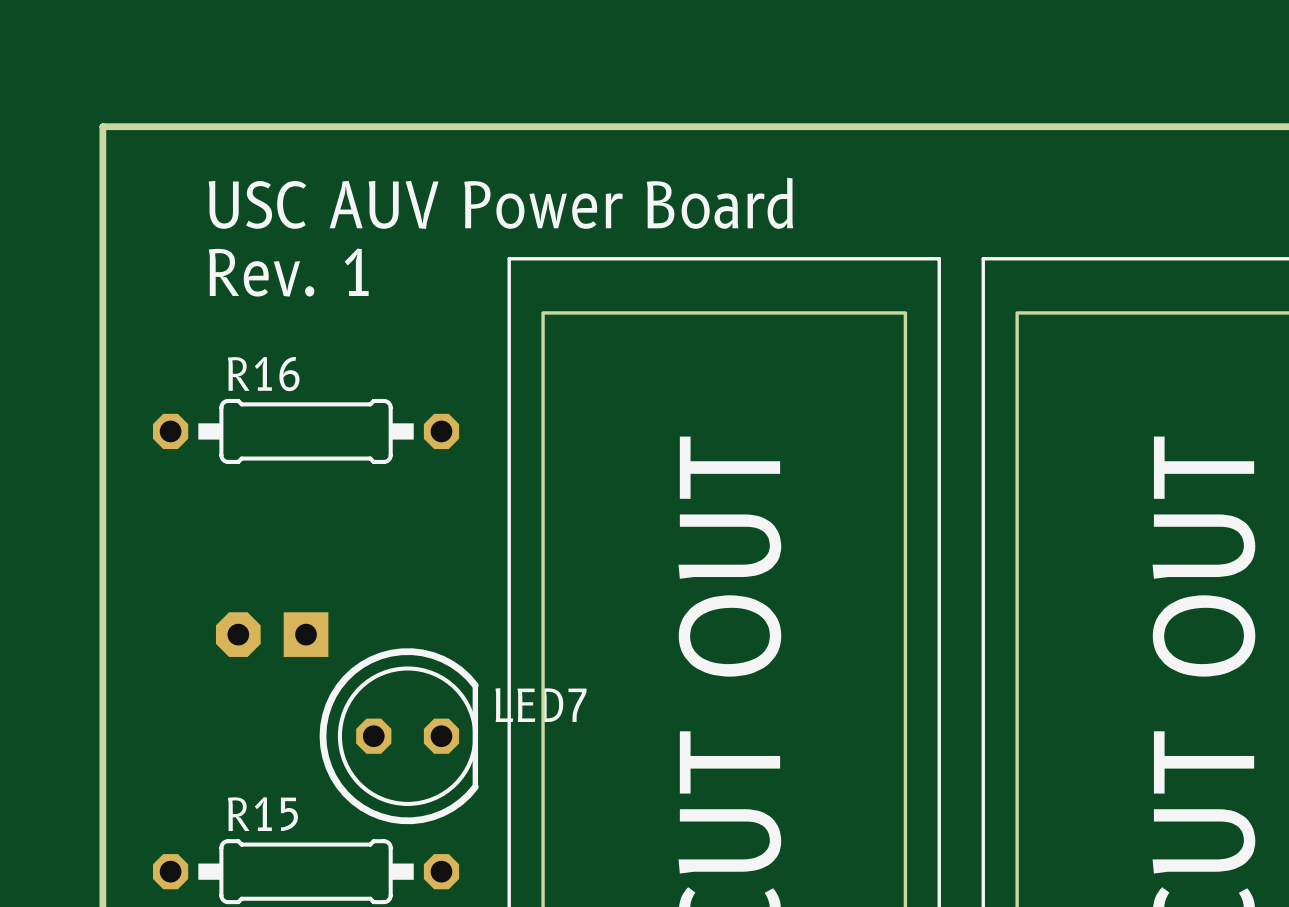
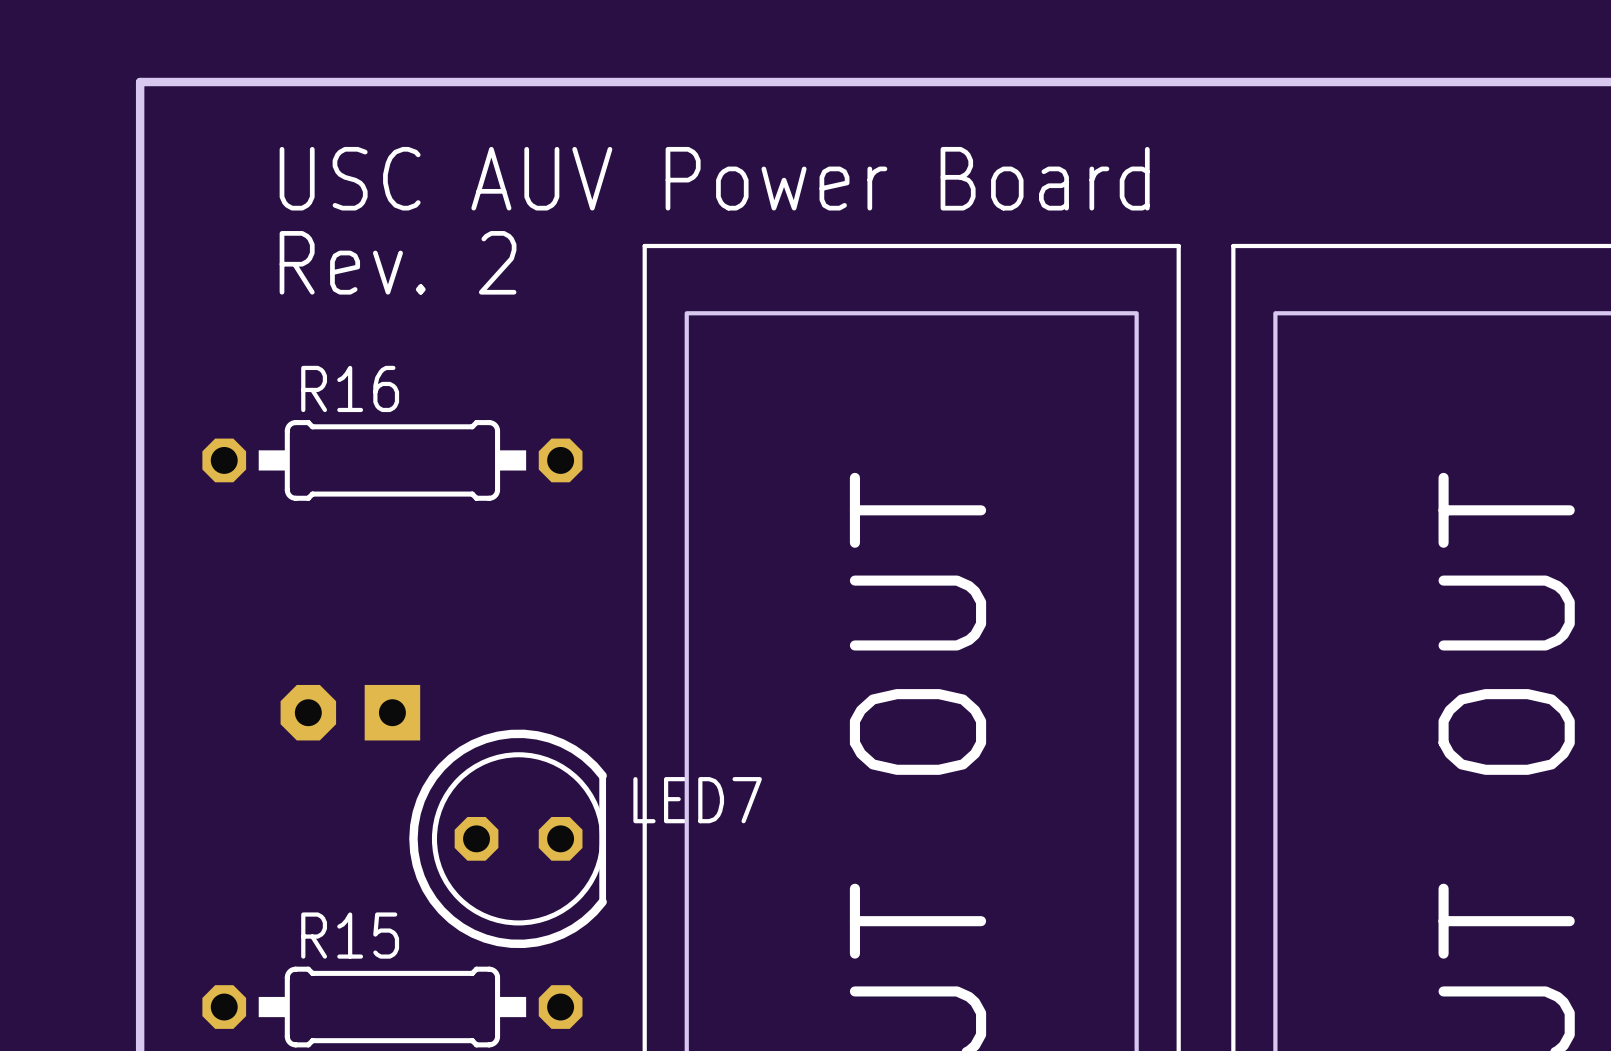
text: Rev. 1 (288, 272) -> Rev. 2 (398, 262)

